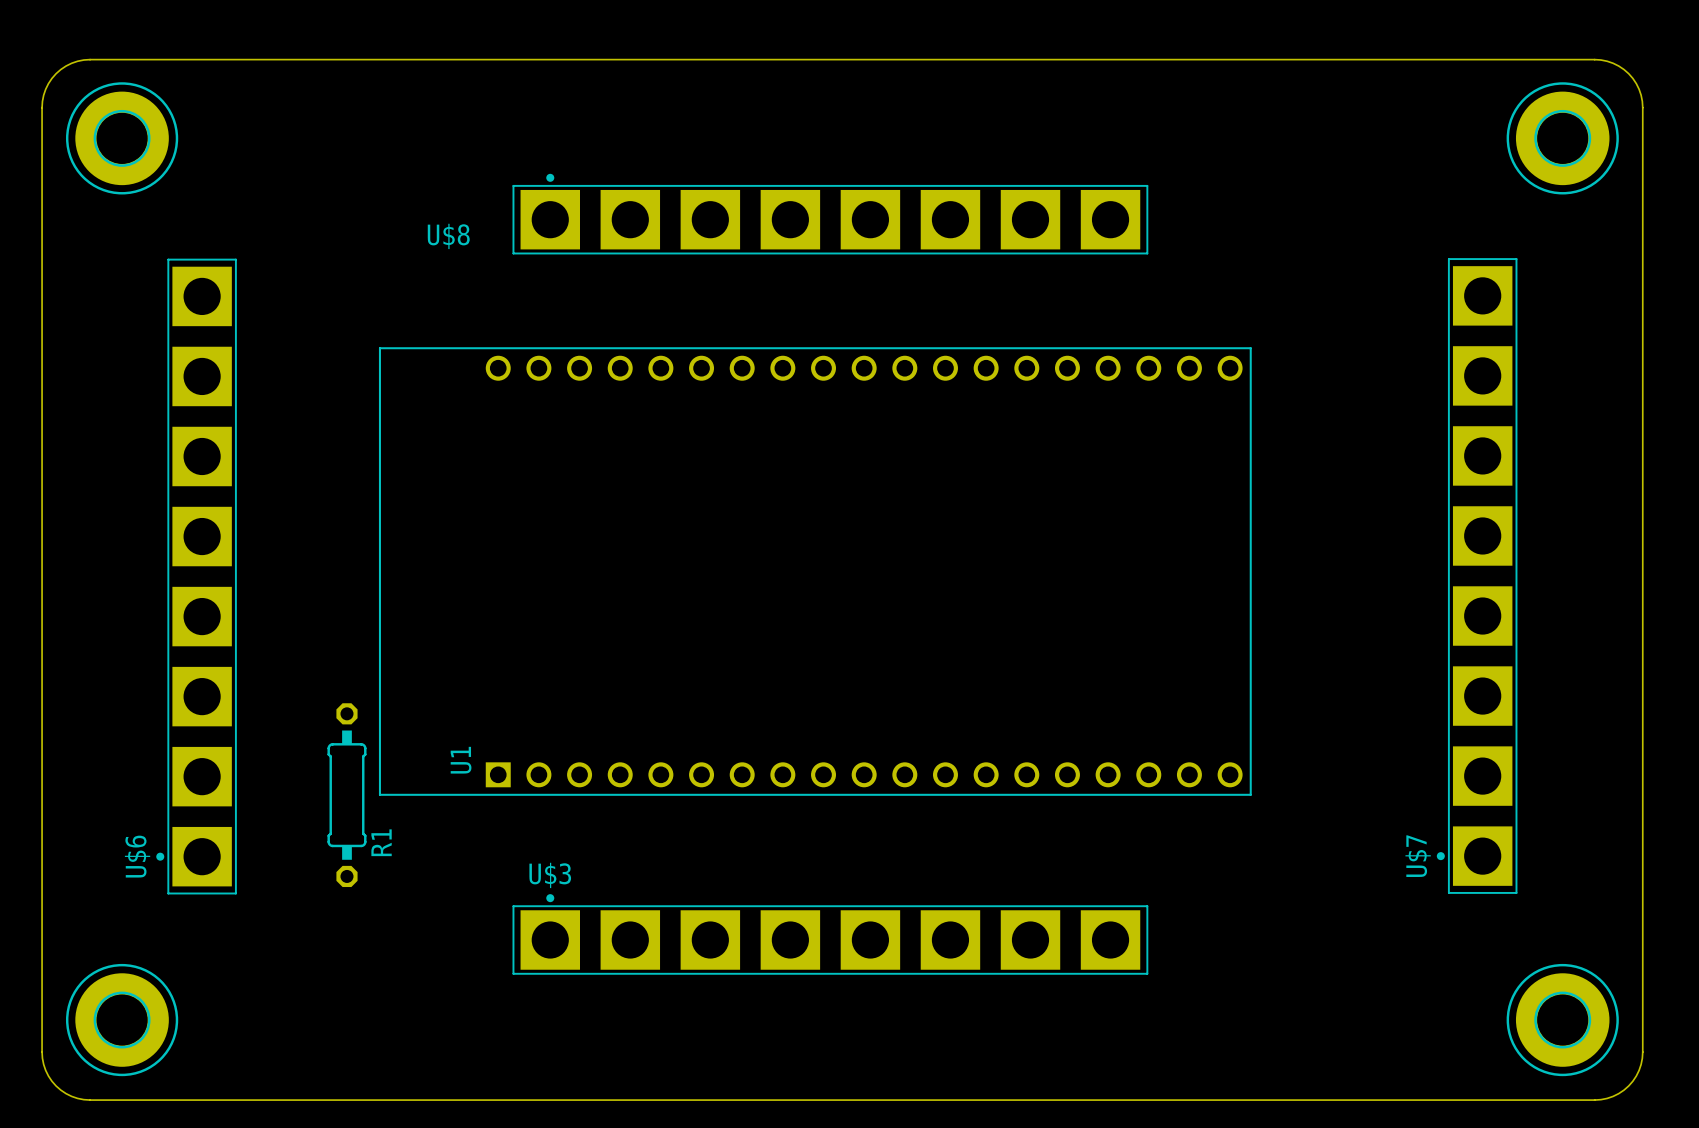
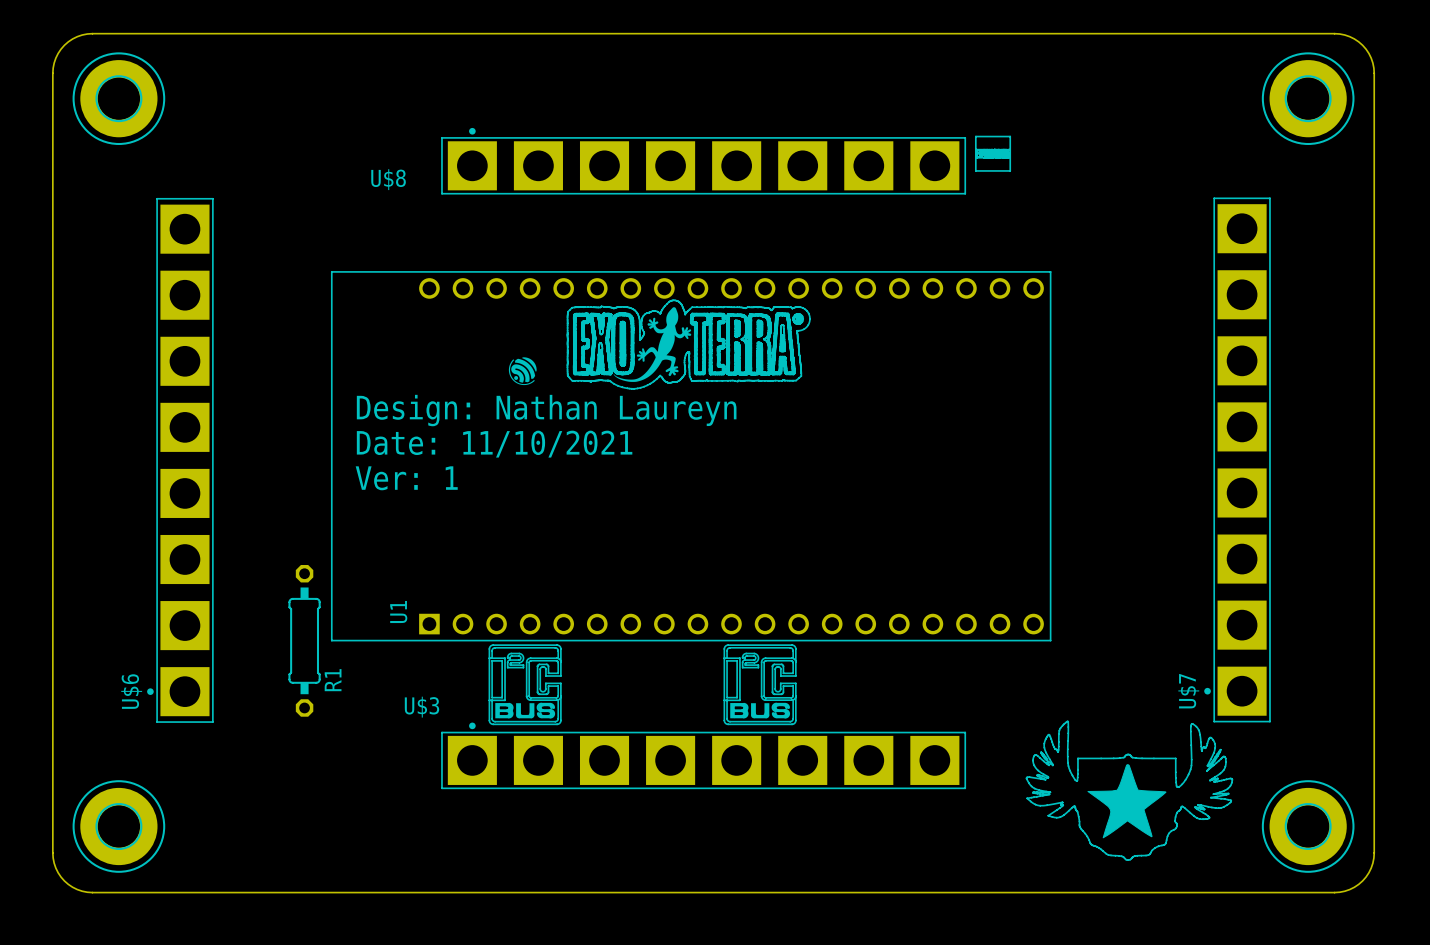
drawing: none -> [975, 136, 1011, 172]
drawing: none -> [567, 300, 810, 389]
drawing: none -> [508, 357, 537, 386]
text: none -> Design: Nathan Laureyn (546, 410)
text: none -> Date: 11/10/2021 (494, 444)
text: none -> Ver: 1 (406, 478)
part: none -> (525, 684)
part: none -> (760, 684)
U$3 name position: U$3 (550, 875) -> U$3 (421, 707)
drawing: none -> [1025, 720, 1233, 861]

